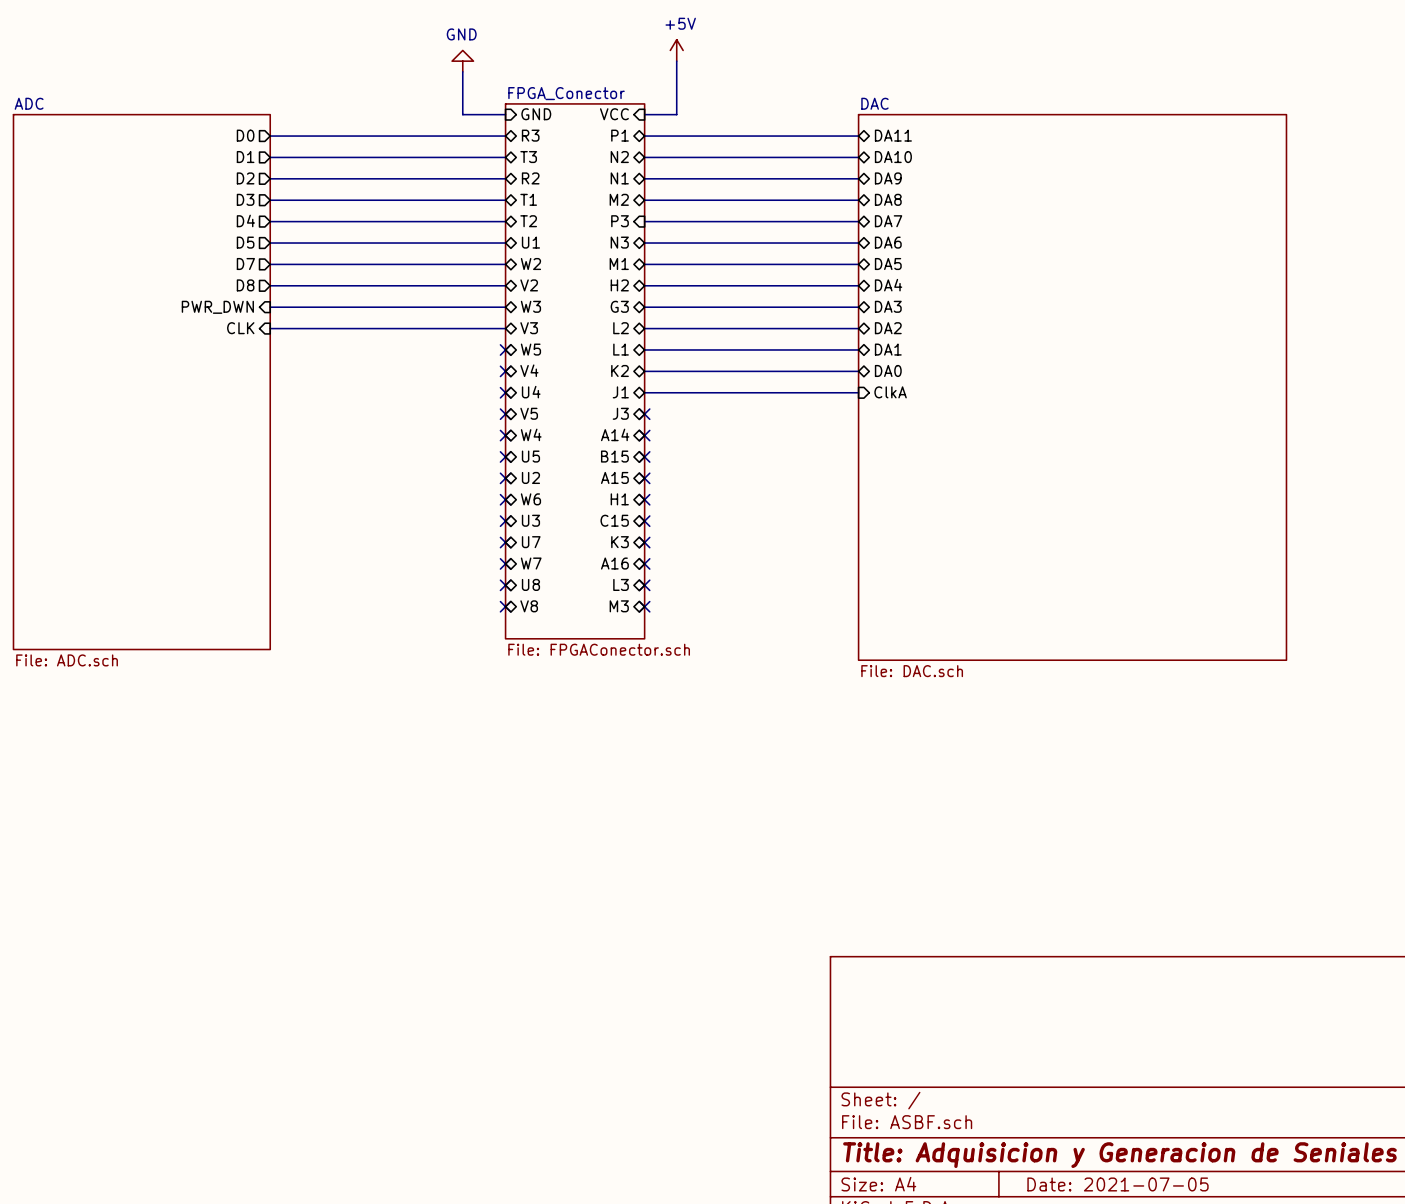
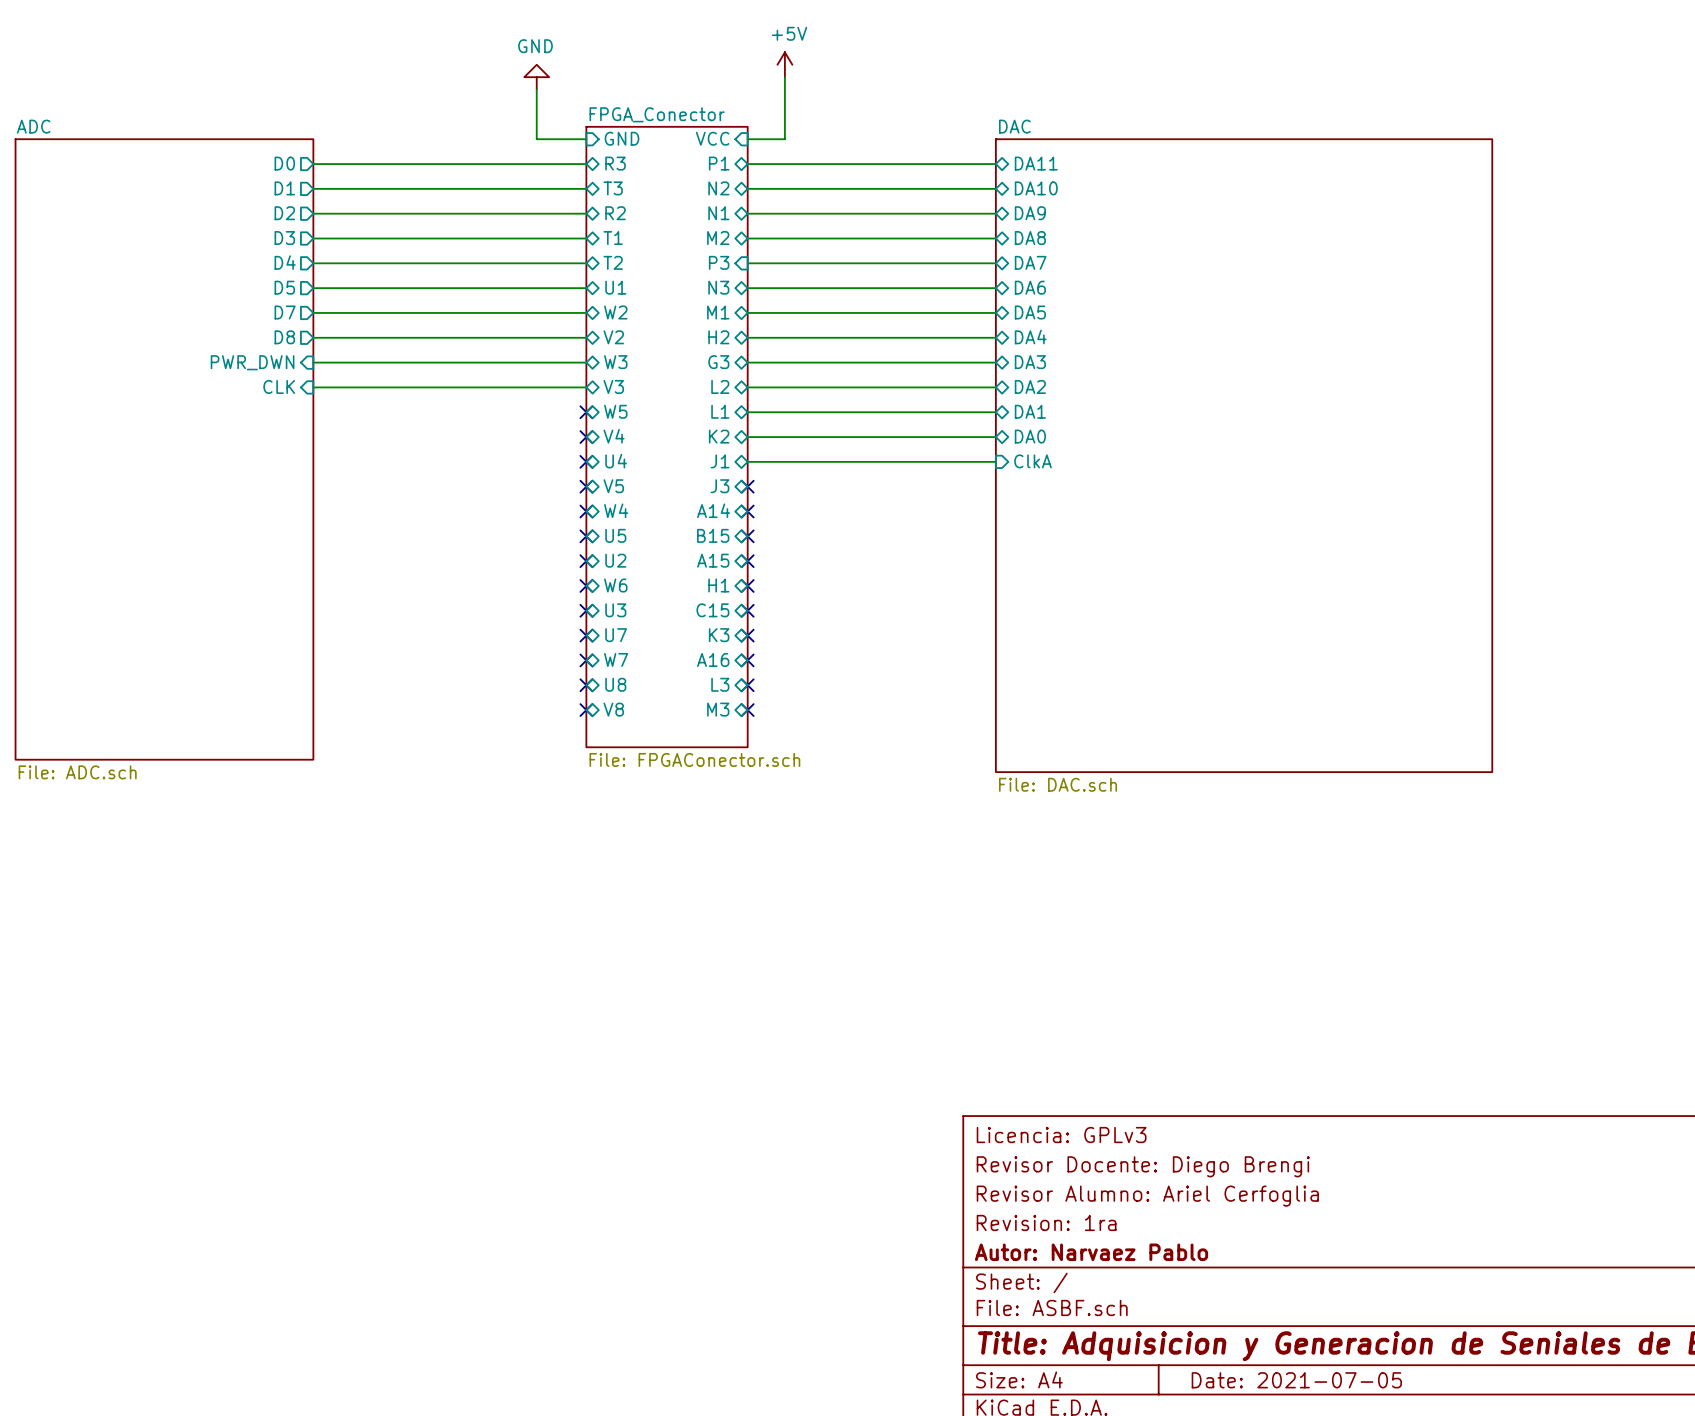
title block: none -> Licencia: GPLv3 (1061, 1135)
title block: none -> Revisor Docente: Diego Brengi (1143, 1166)
title block: none -> Revisor Alumno: Ariel Cerfoglia (1147, 1196)
title block: none -> Revision: 1ra (1046, 1222)
title block: none -> Autor: Narvaez Pablo (1091, 1252)

